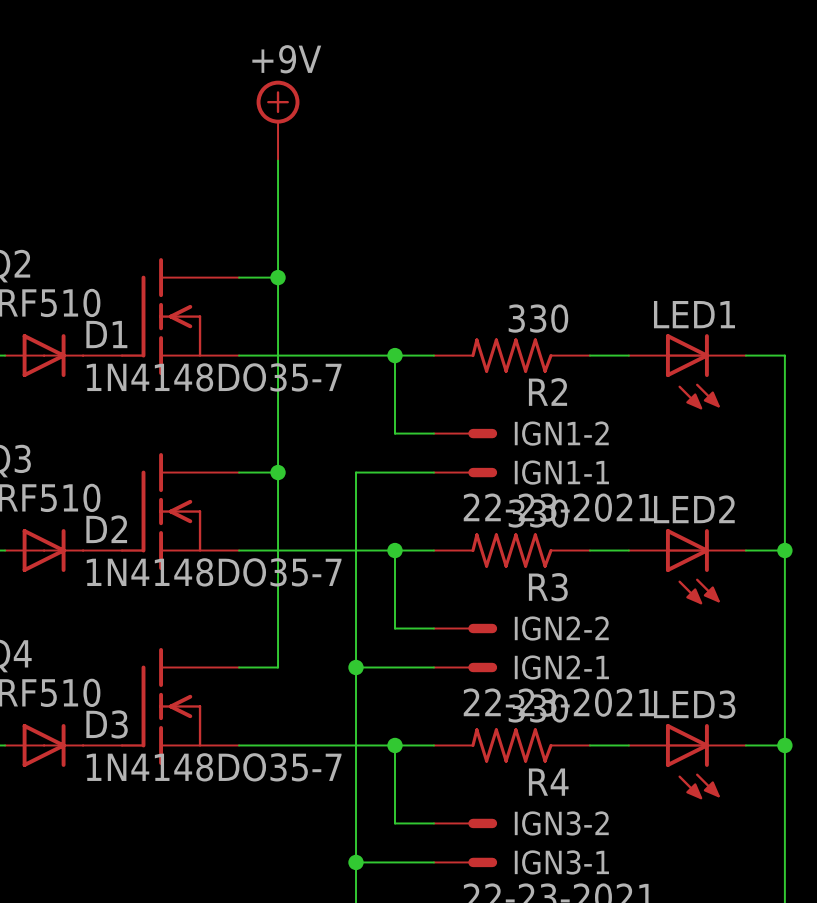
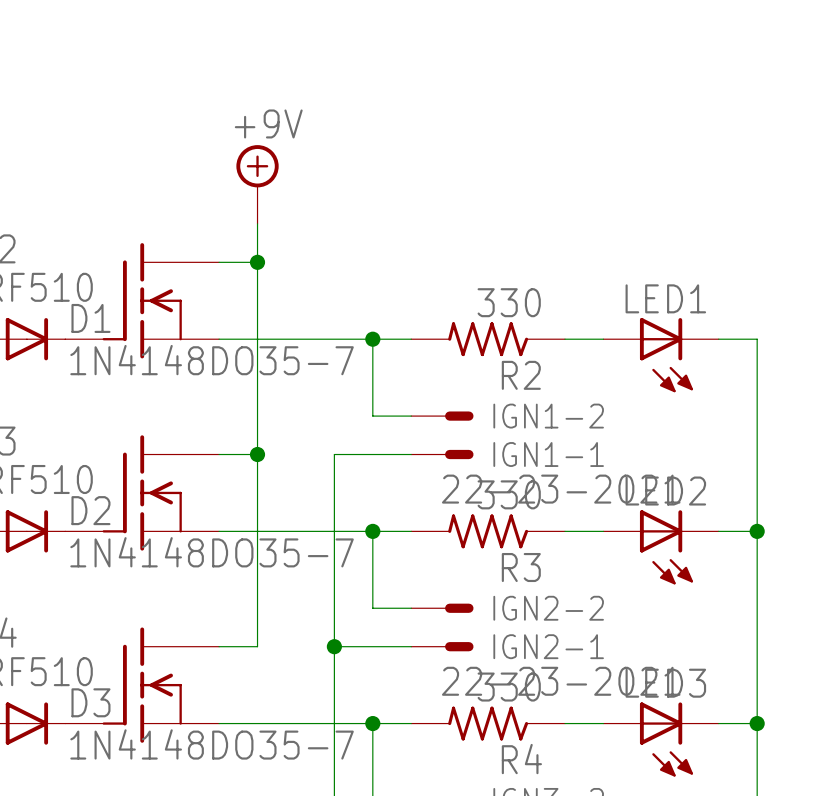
power symbol position: +9V (278, 120) -> +9V (257, 184)

